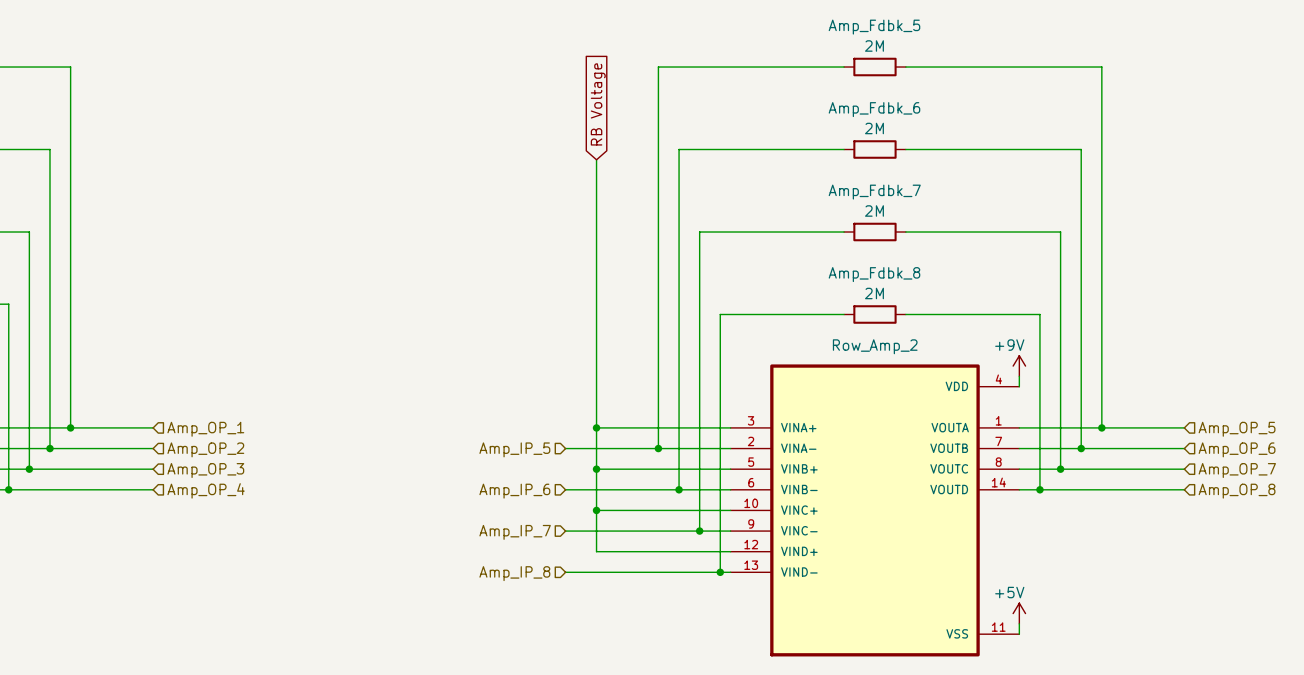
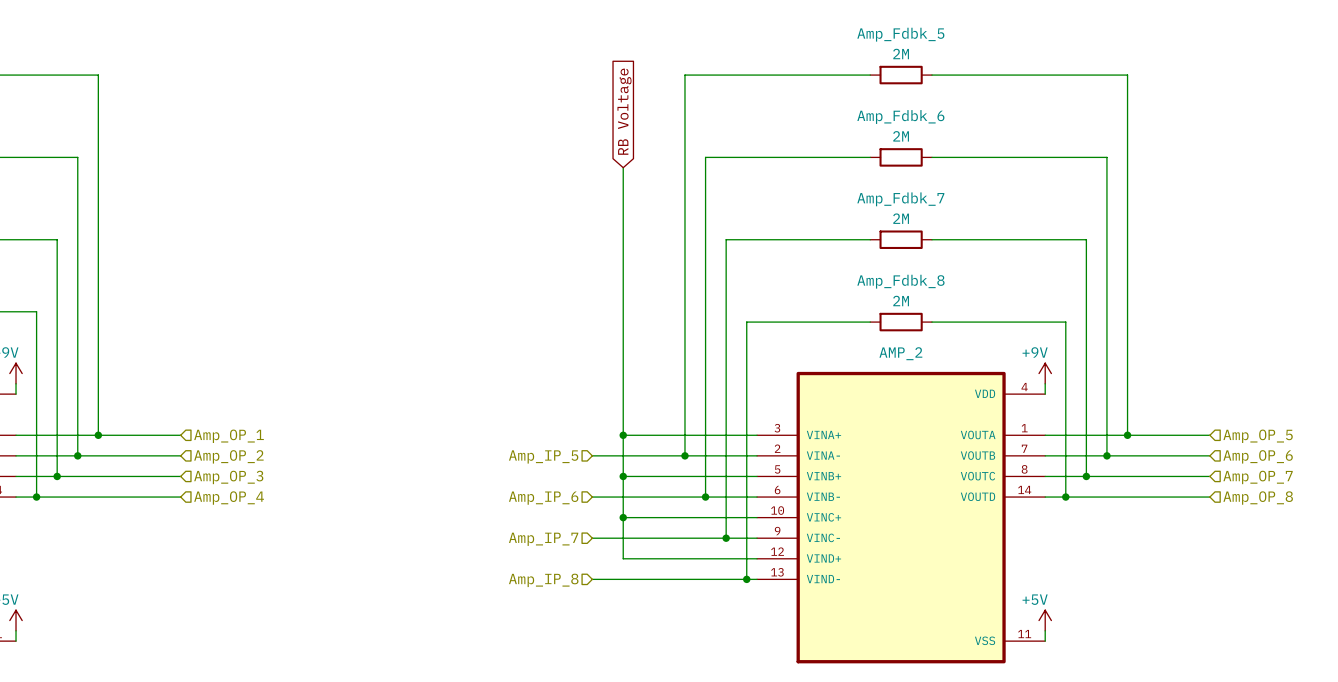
Row_Amp_2 name: Row_Amp_2 (875, 346) -> AMP_2 (900, 353)

